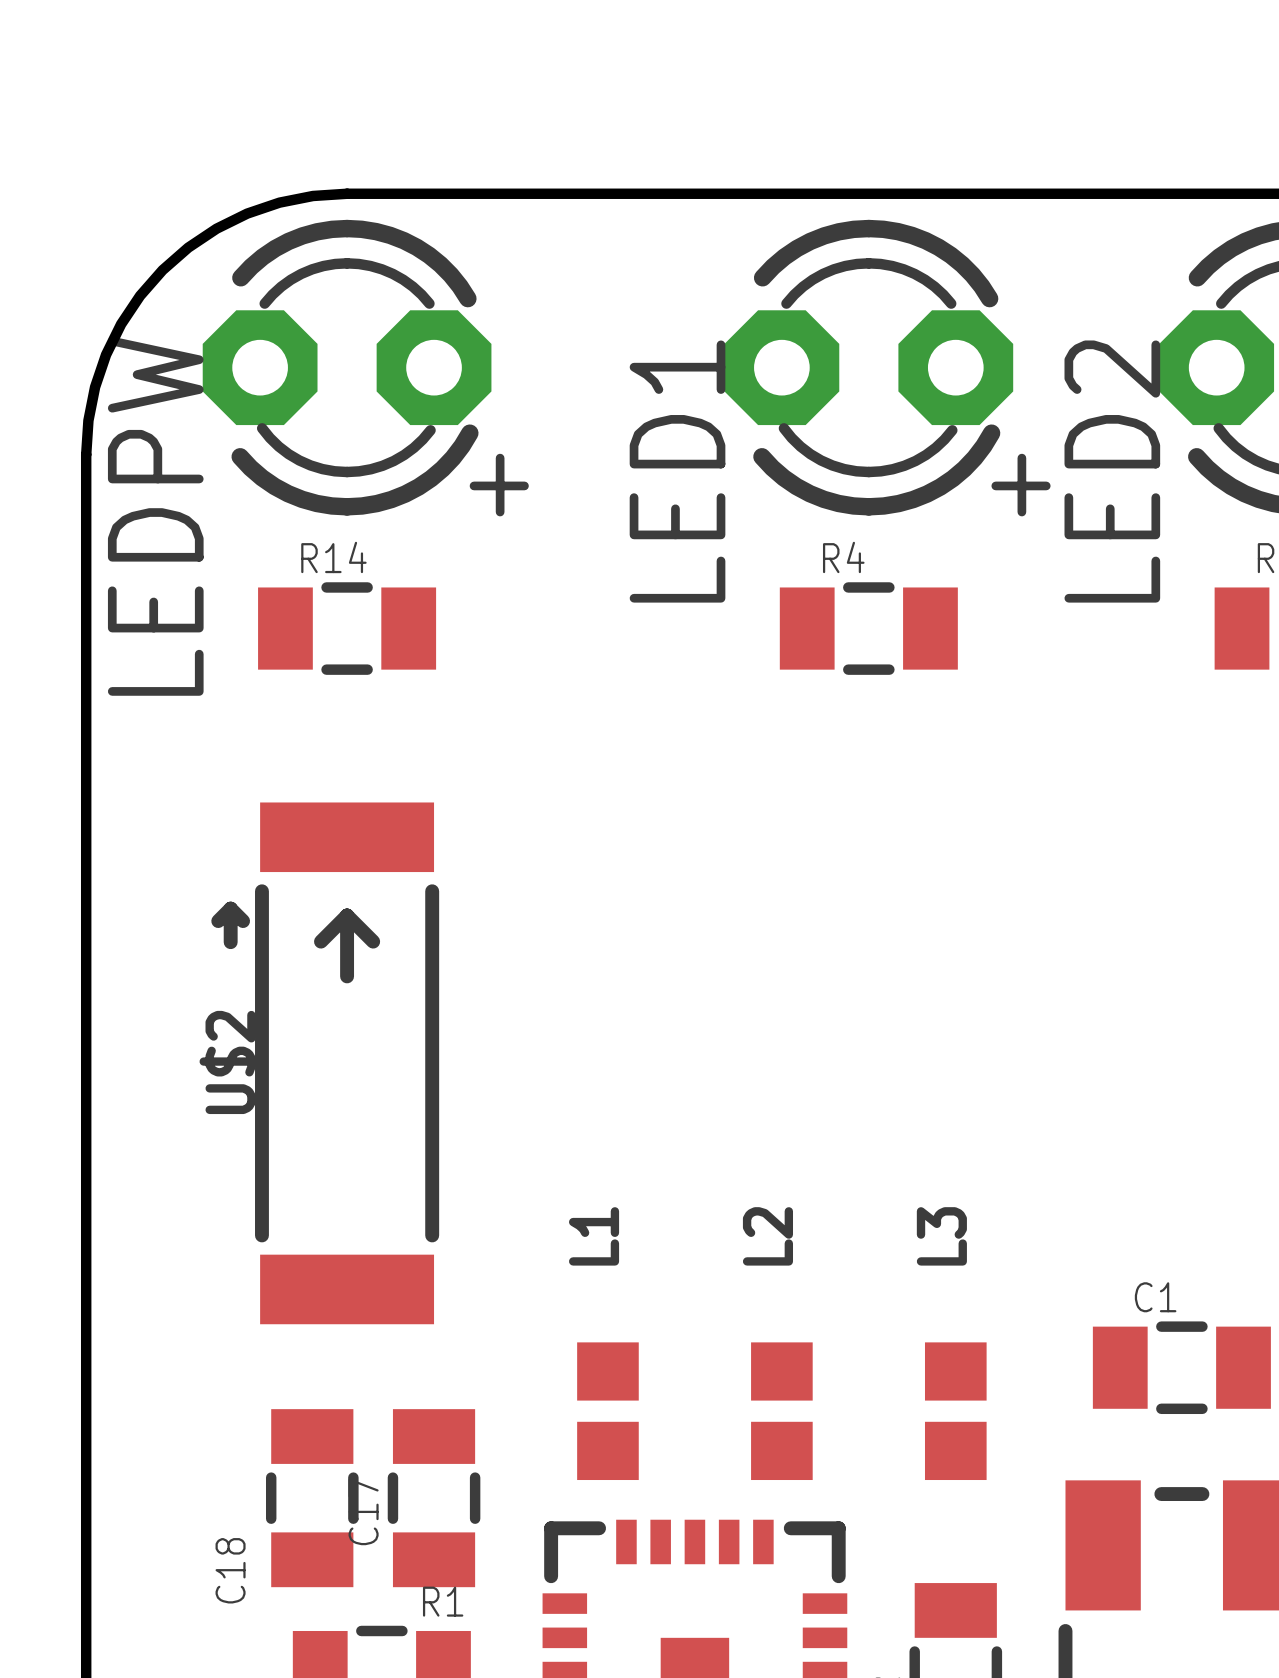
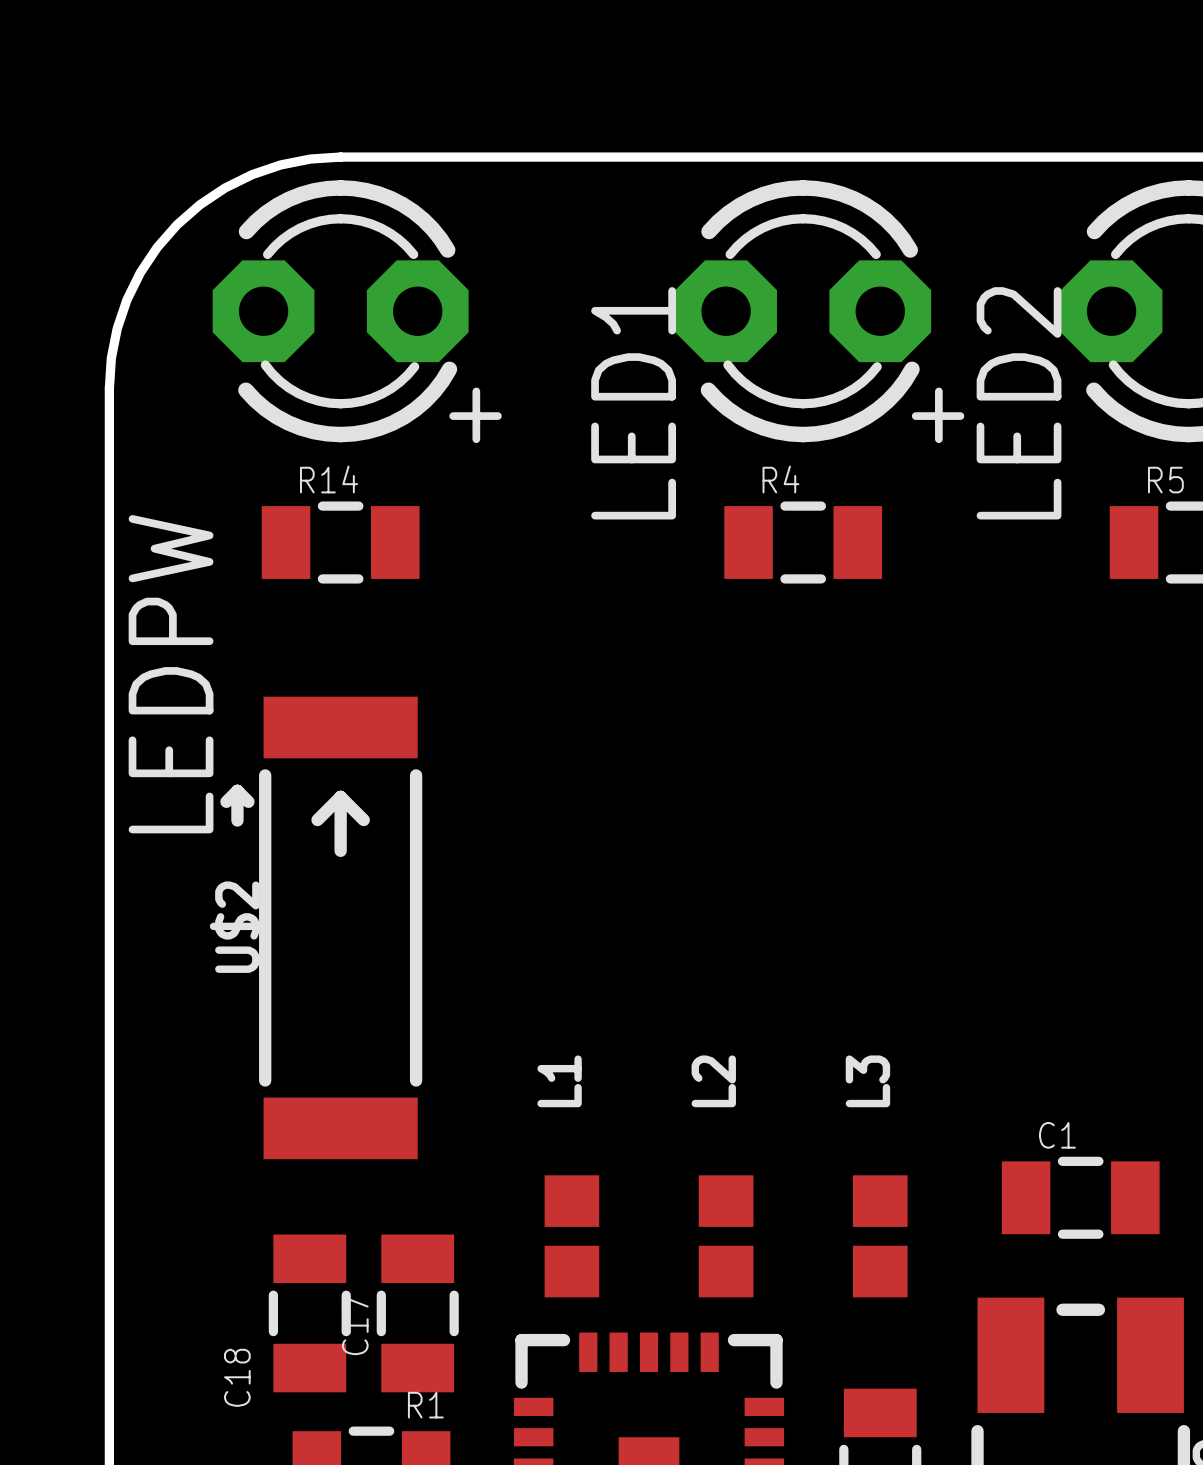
LEDPW name position: LEDPW (155, 516) -> LEDPW (171, 674)

